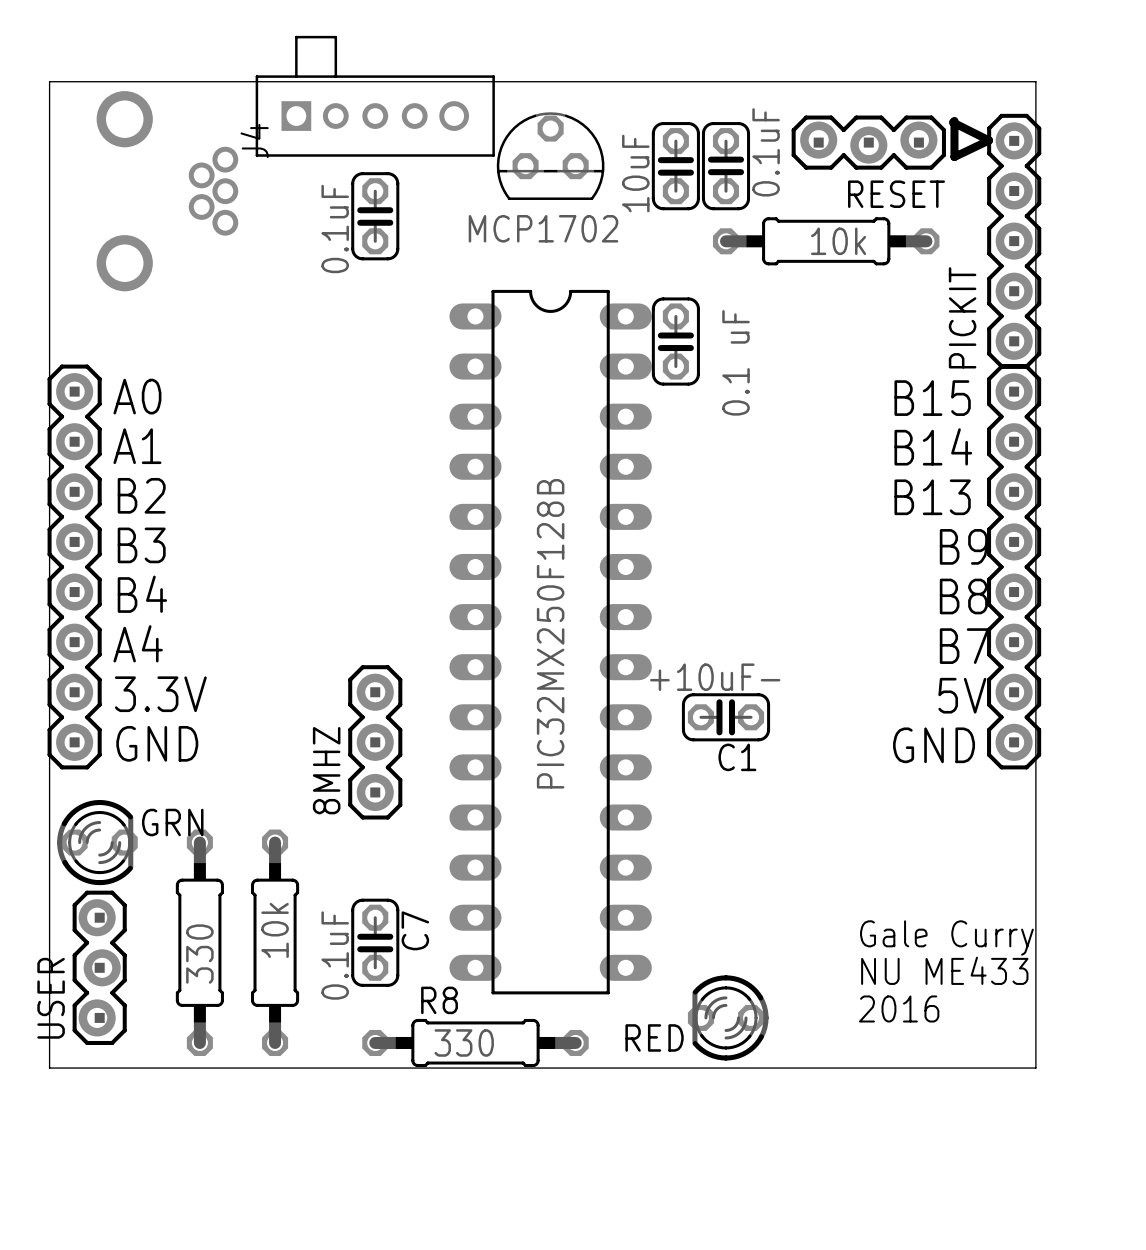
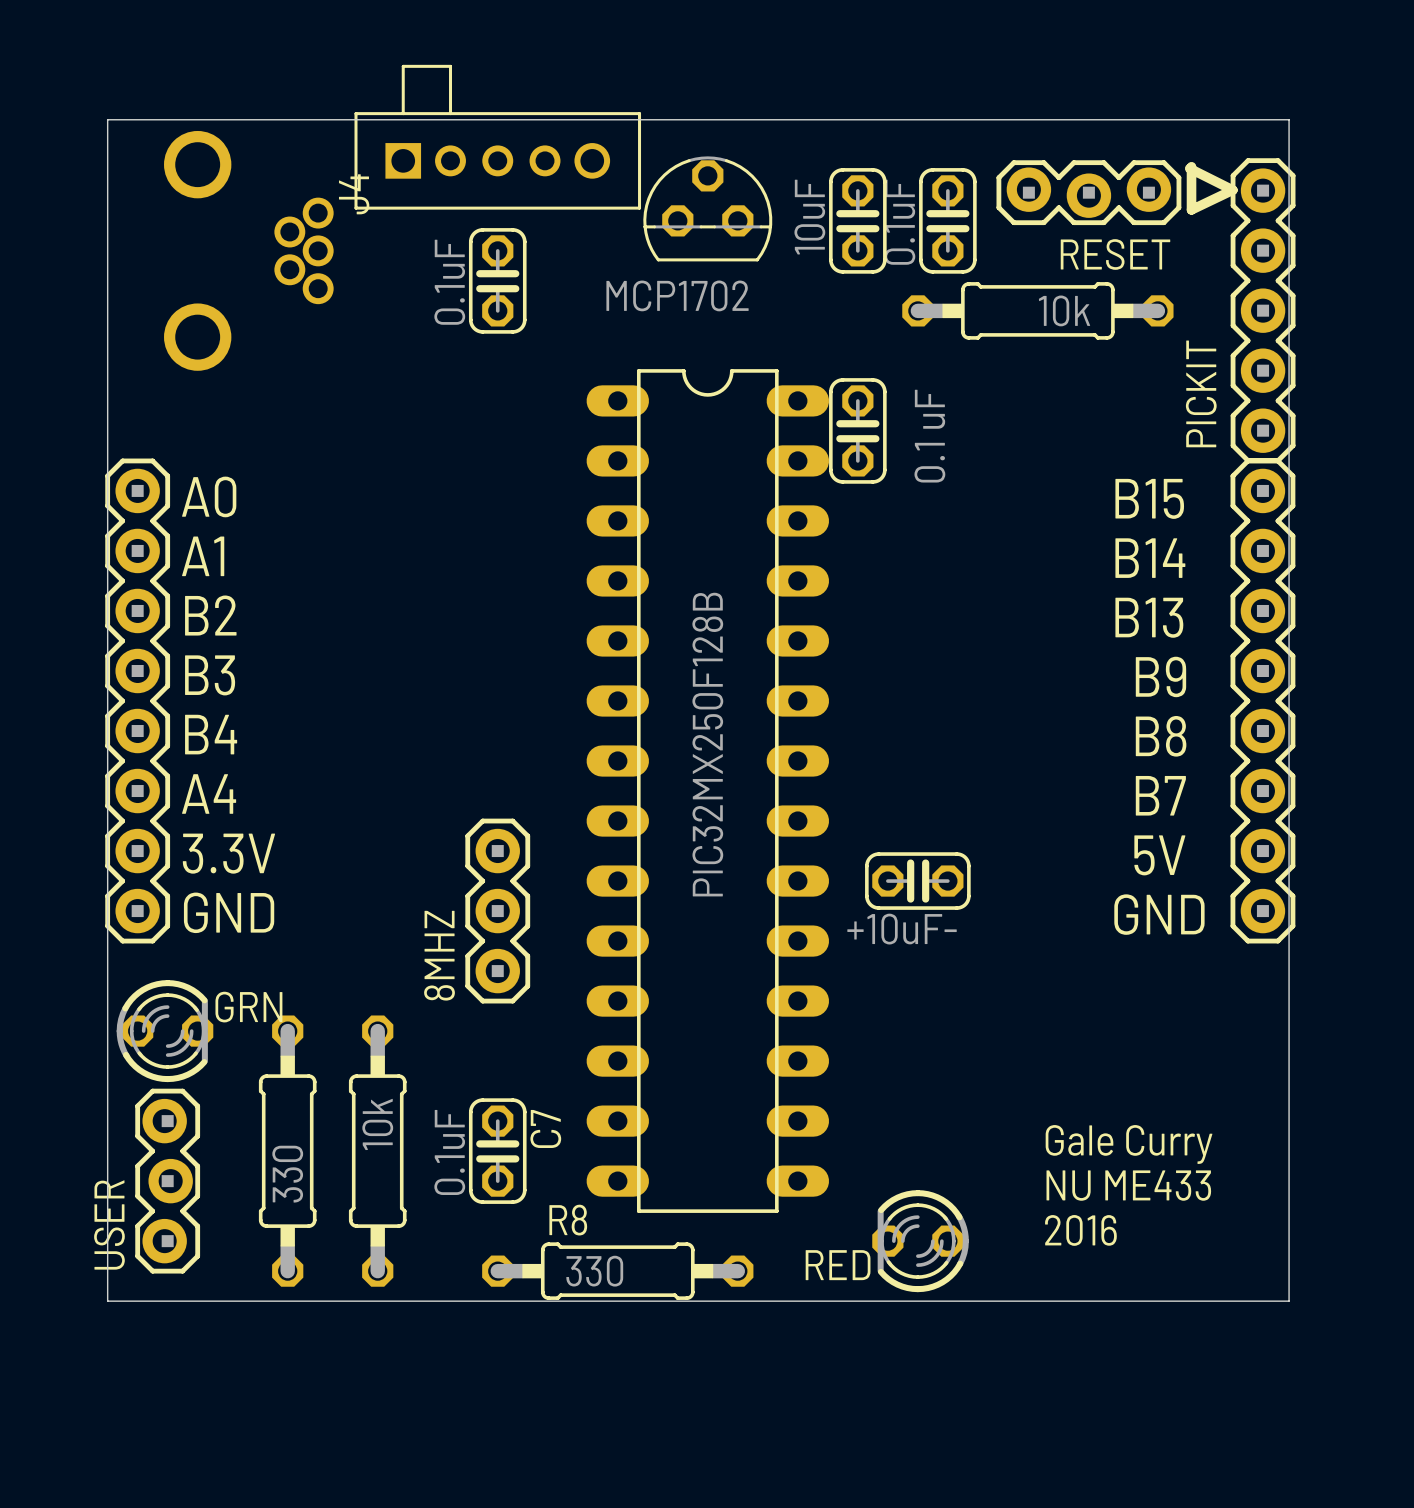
part rotation: 0° (726, 166) -> 180° (947, 220)
C1: +10uF- (726, 717) -> none
part: none -> +10uF- (917, 881)
text position: Gale Curry (946, 937) -> Gale Curry (1129, 1144)
text position: NU ME433 (944, 970) -> NU ME433 (1128, 1185)
text position: 2016 (899, 1008) -> 2016 (1080, 1230)

